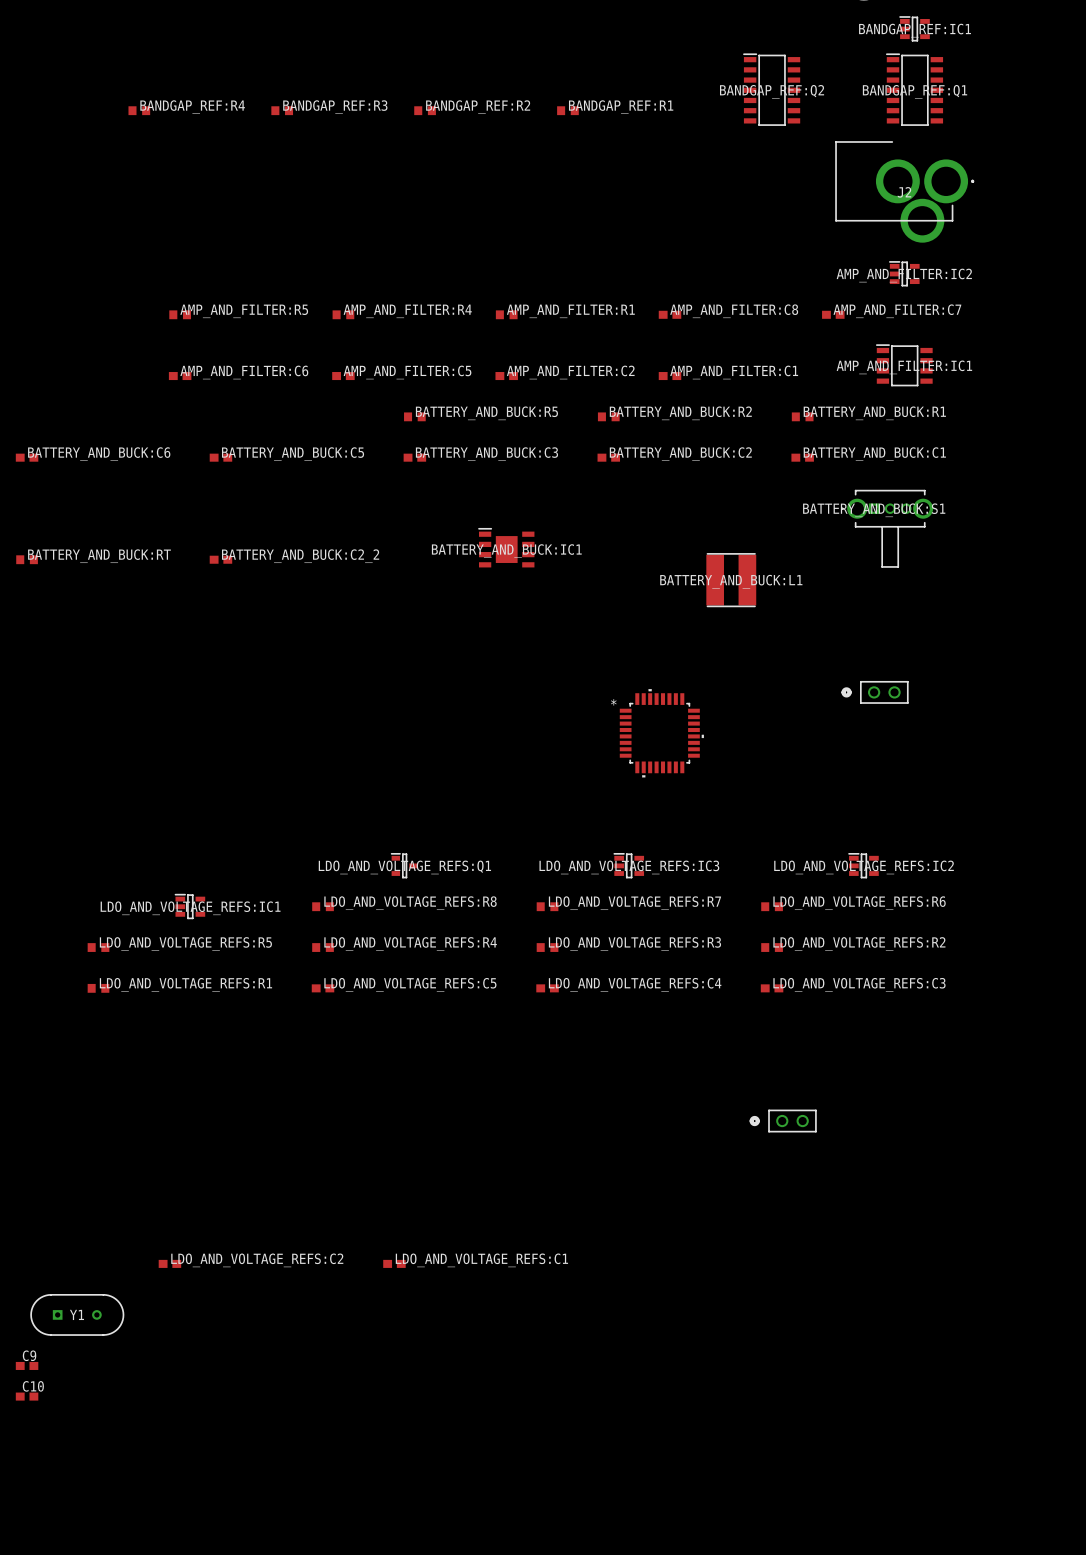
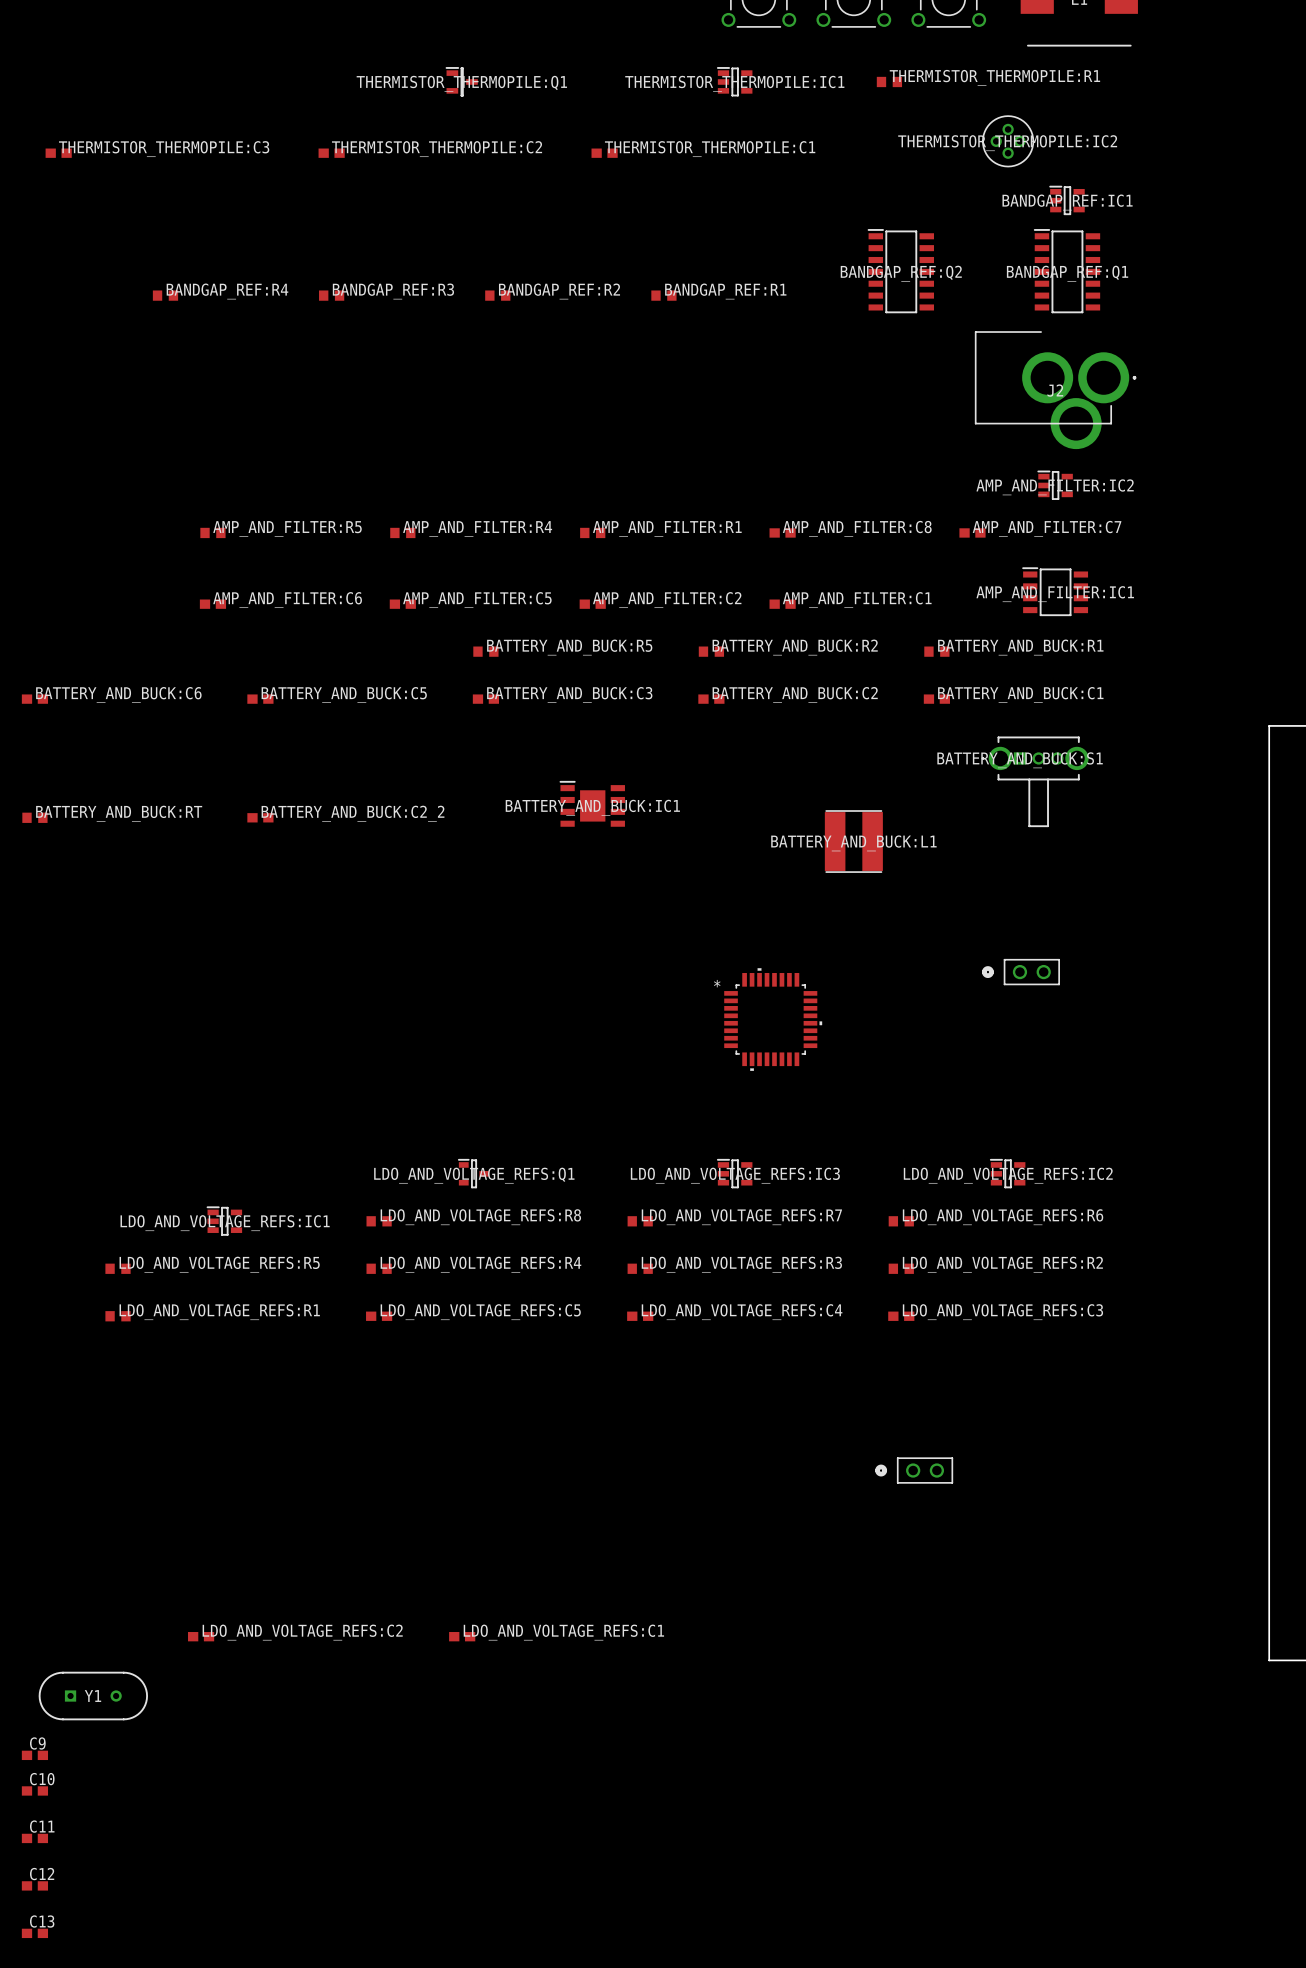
C11: none -> (34, 1838)
C12: none -> (34, 1885)
C13: none -> (34, 1933)

